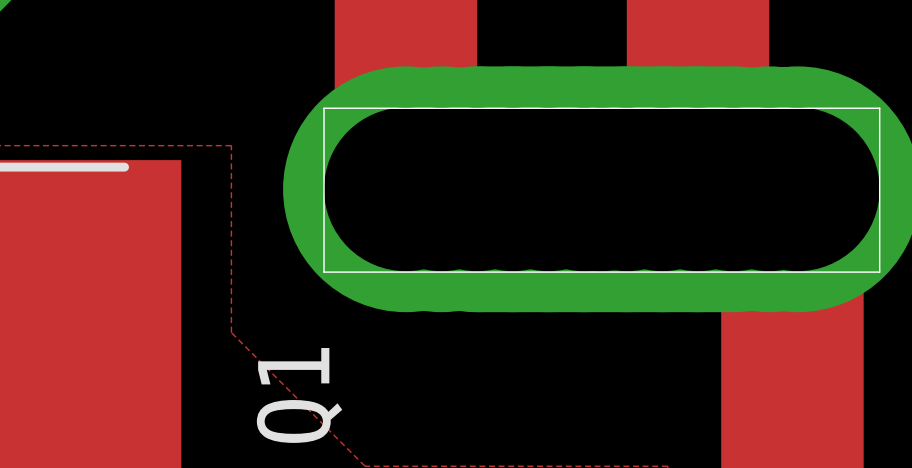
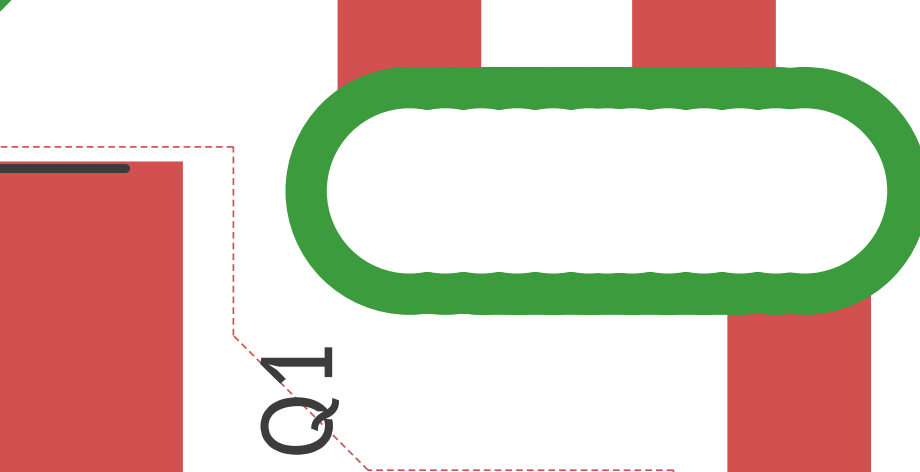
board edge: (324, 108) (324, 272) (879, 272) (879, 108) (324, 108) -> none

